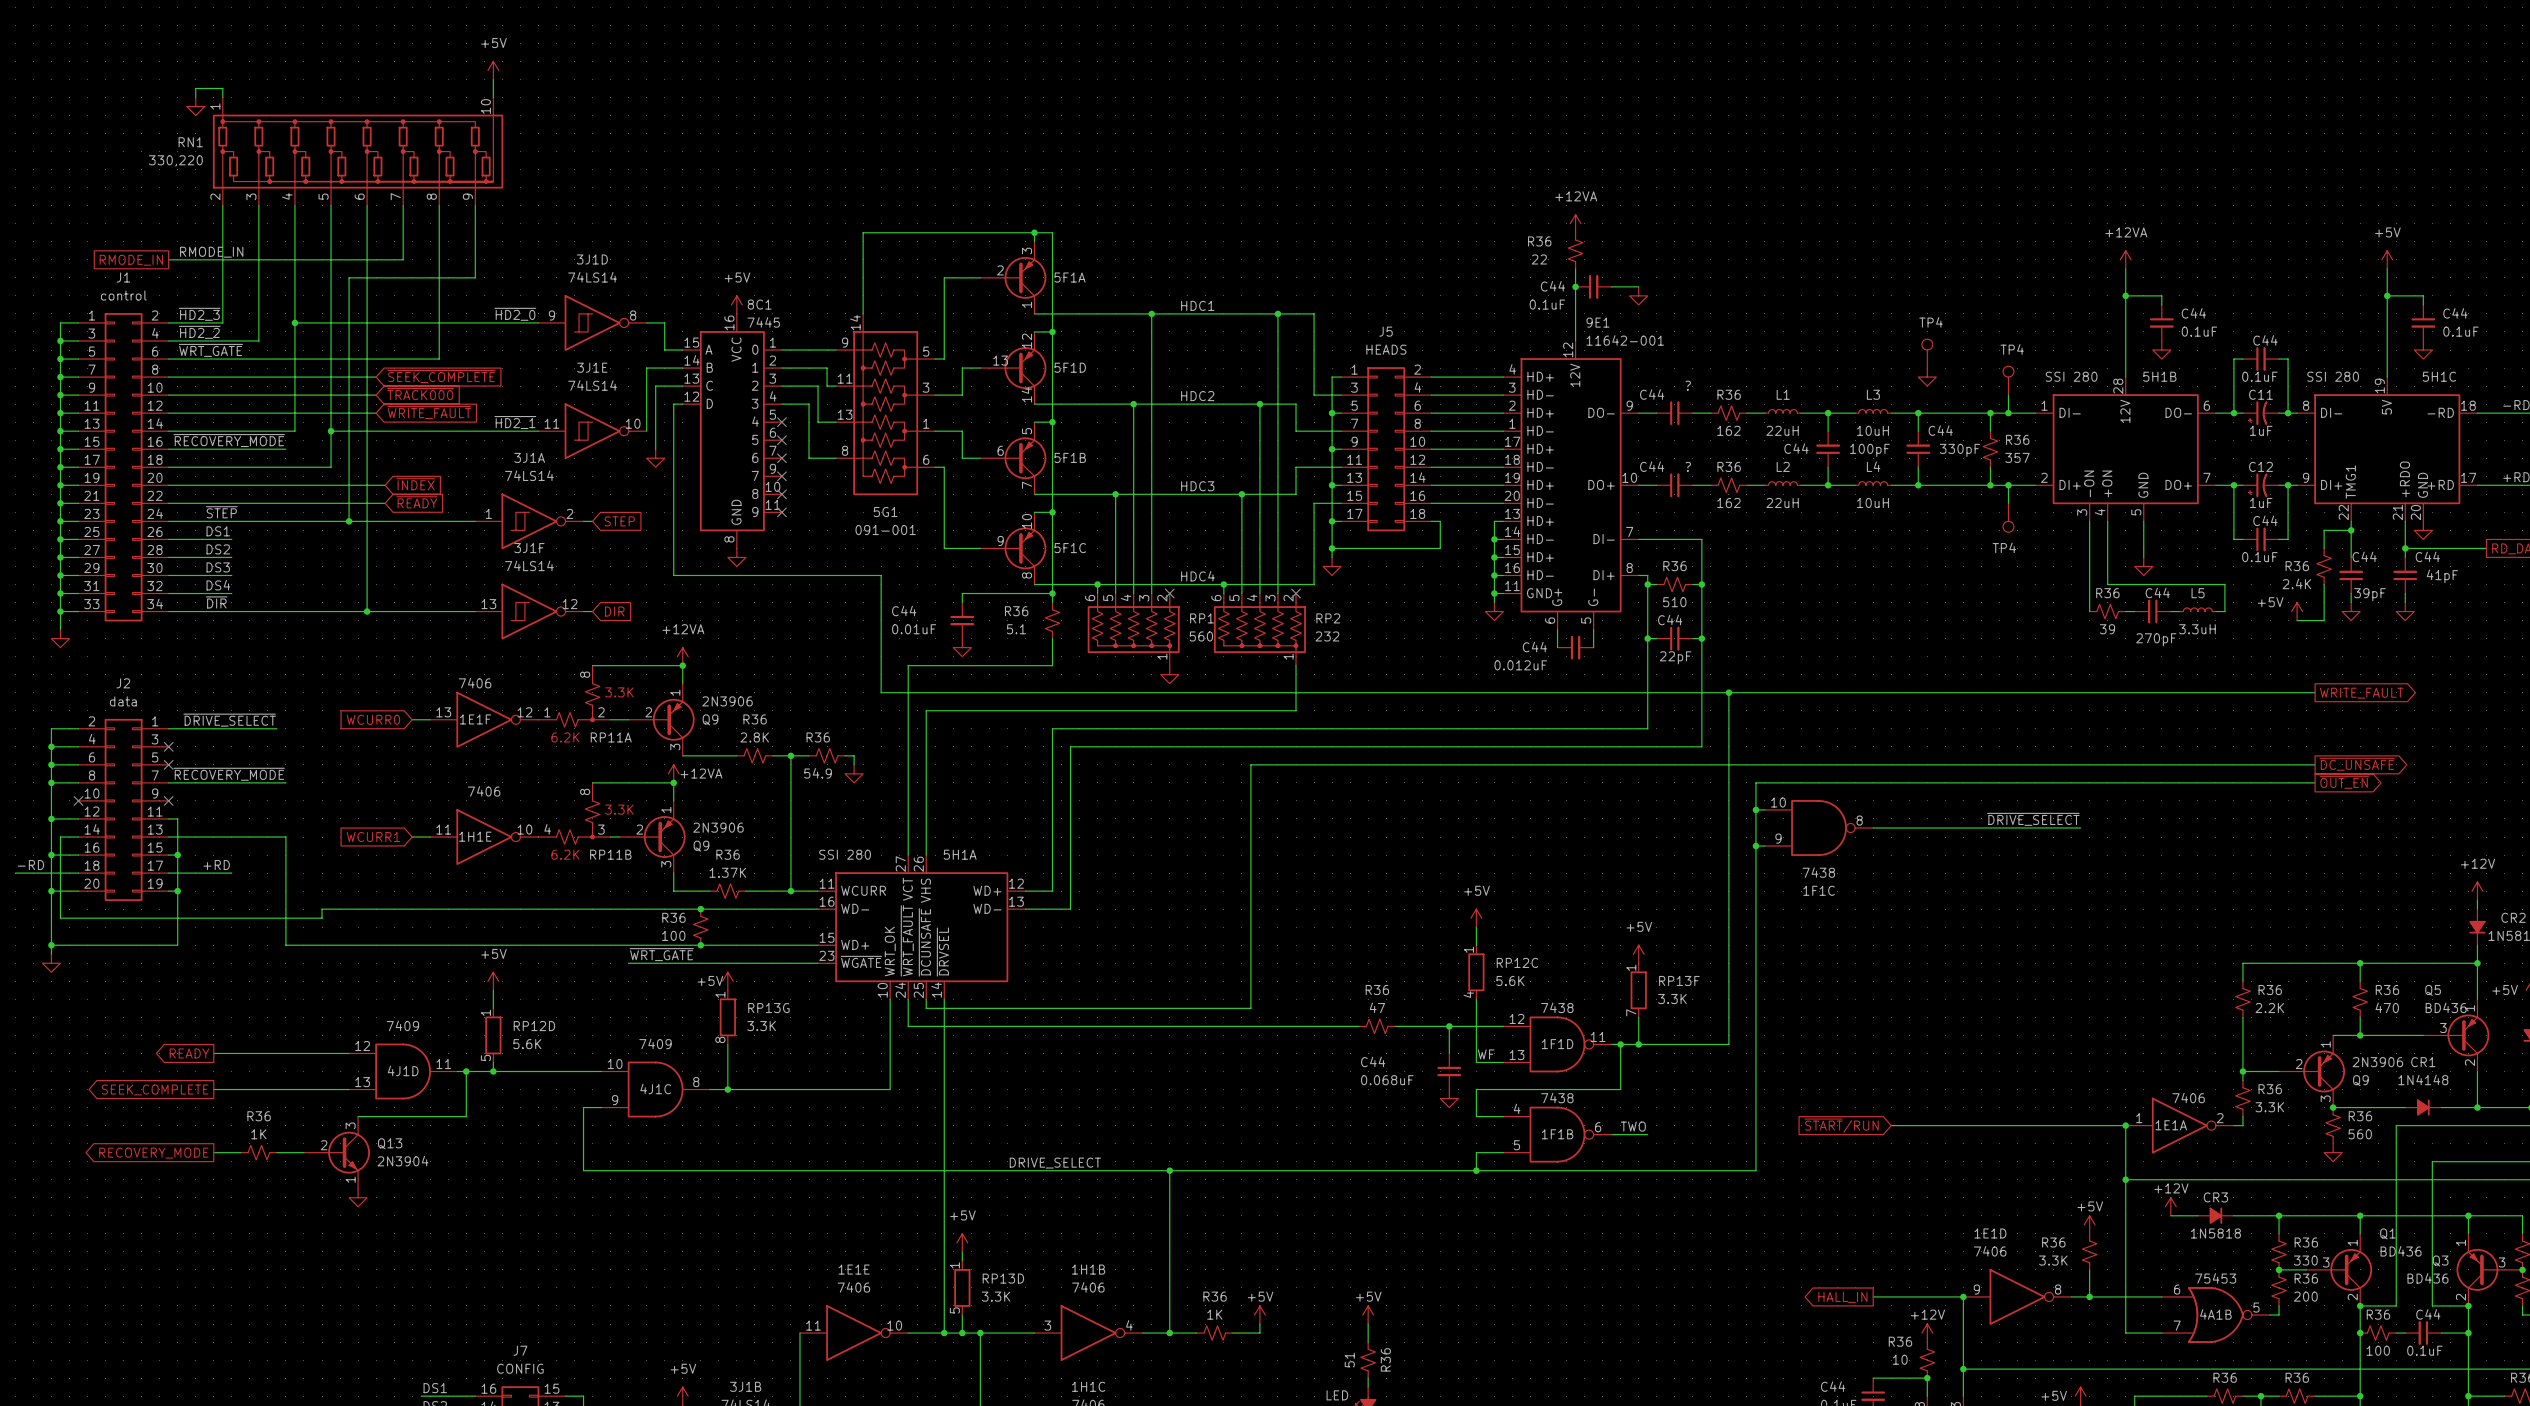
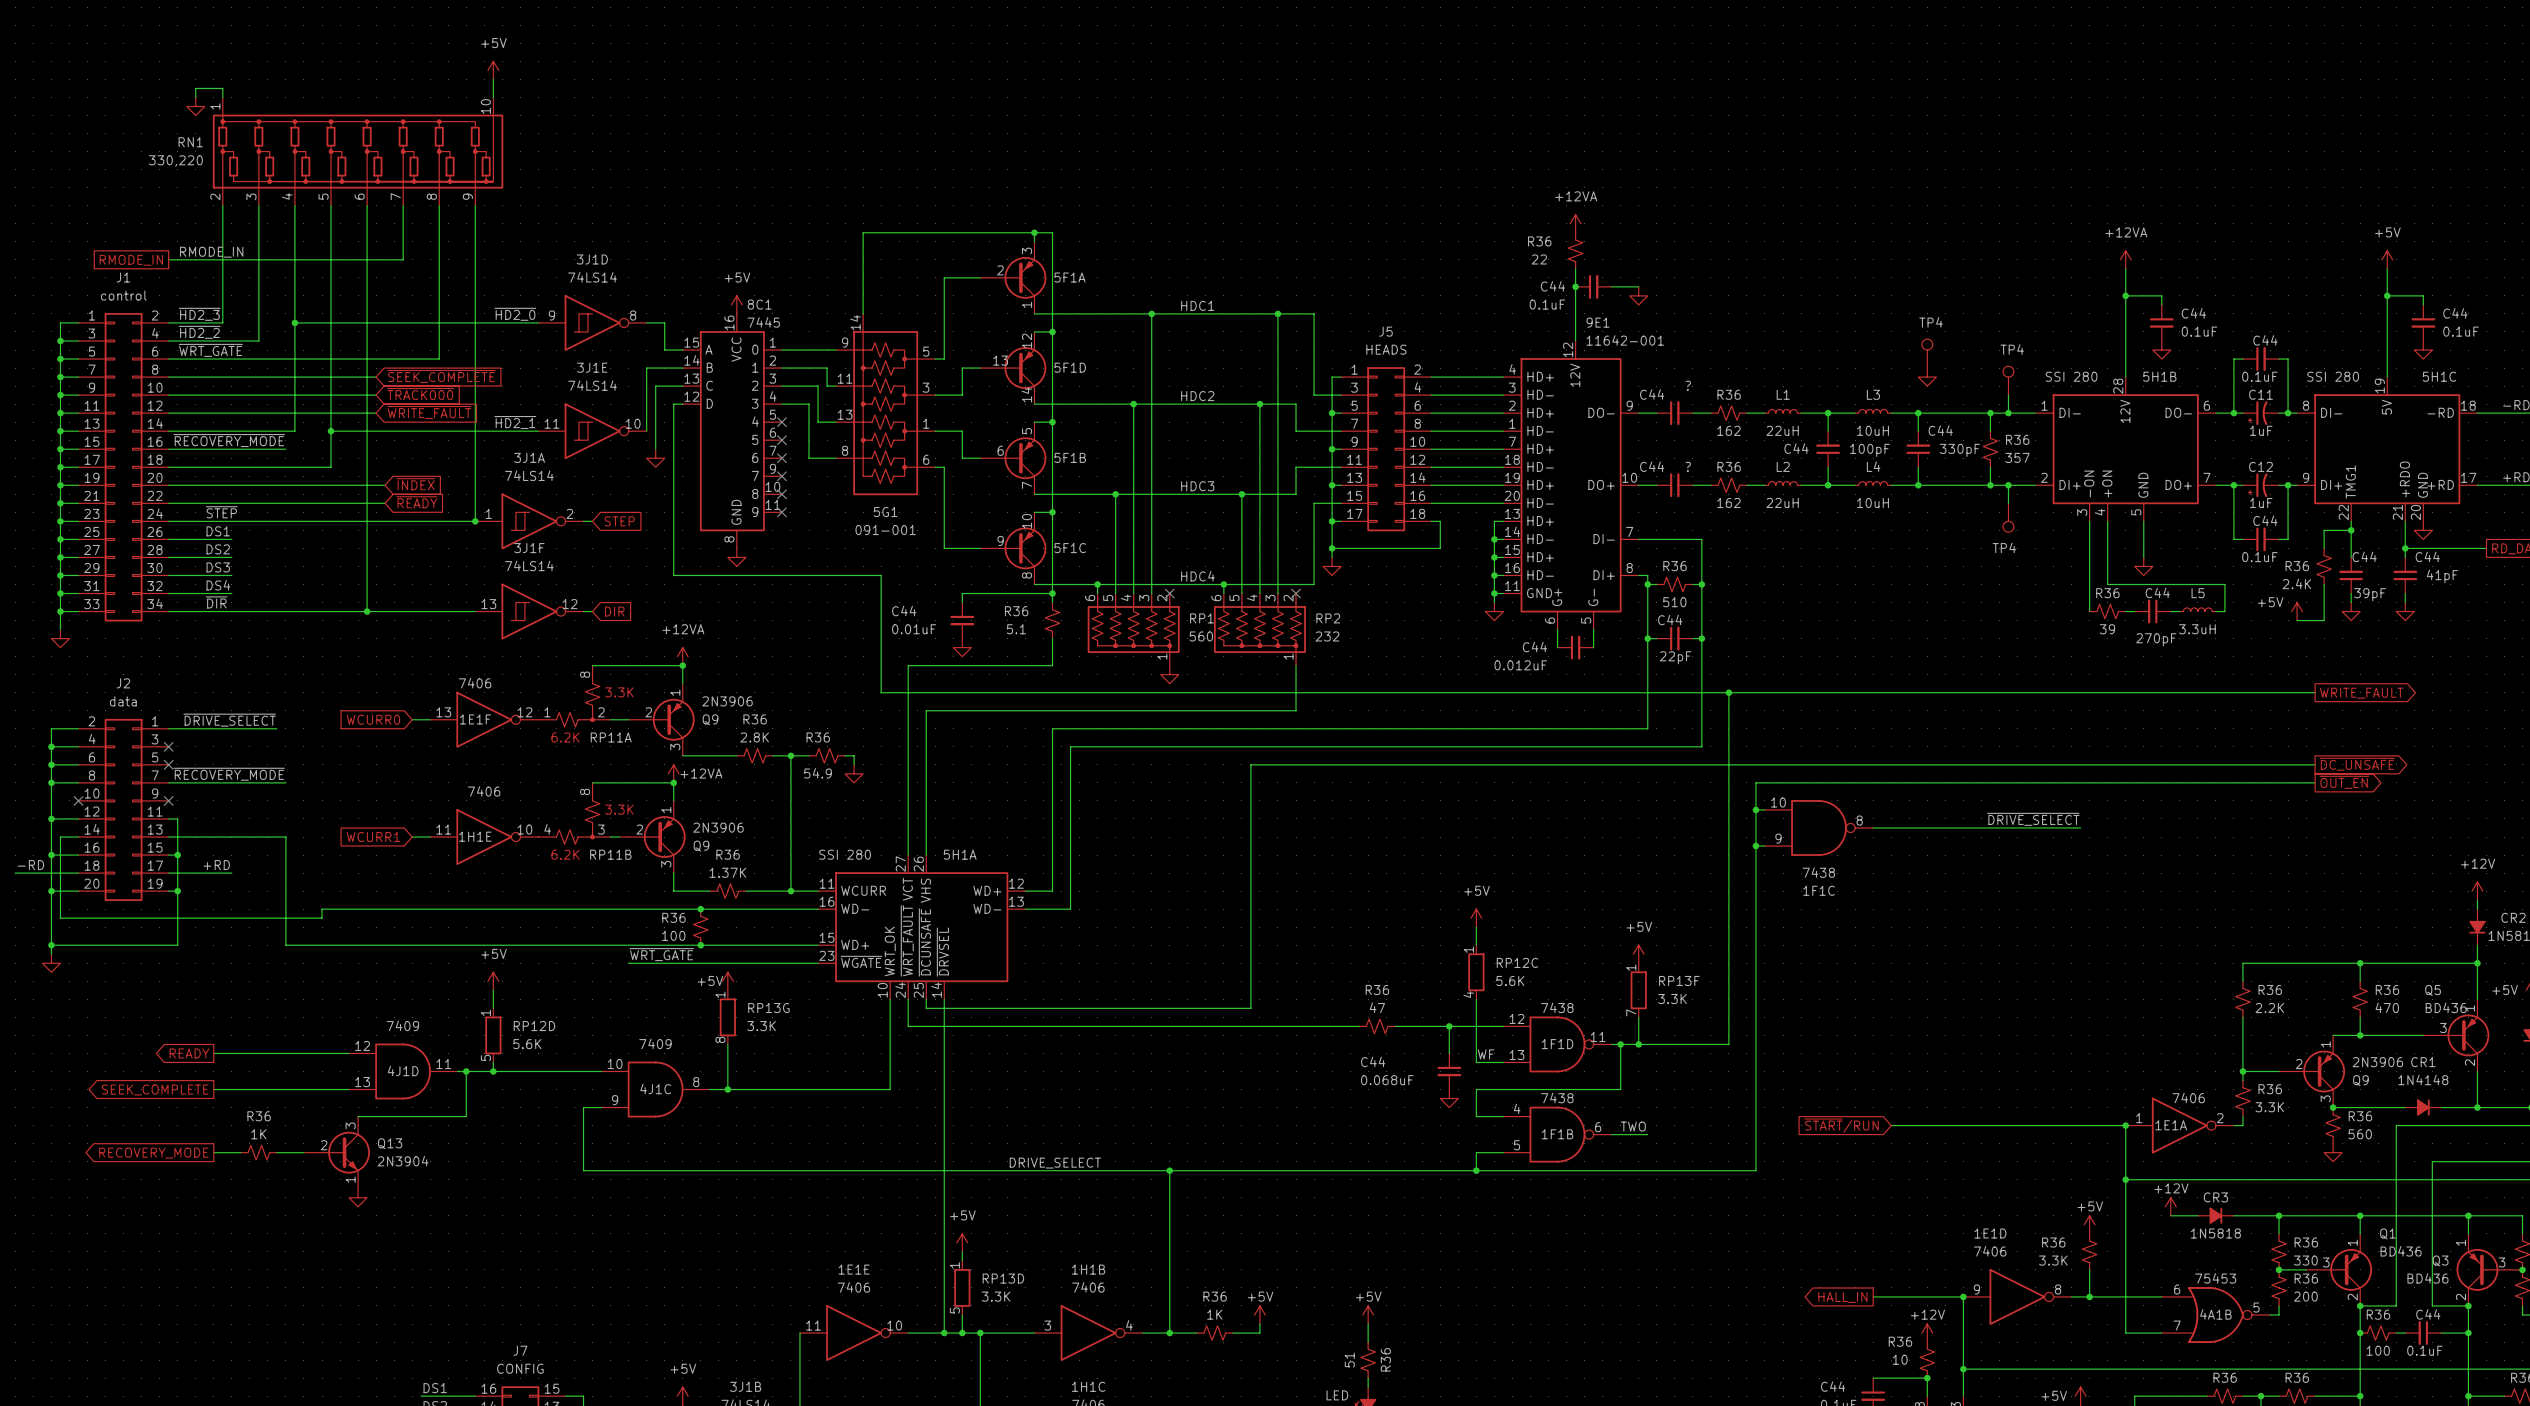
wire: (475, 277) (349, 277) (349, 521) -> (475, 277) (475, 521)
9E1 pin number: 17 (1512, 441) -> 7 (1512, 441)
junction: (349, 521) -> none
junction: none -> (475, 521)

